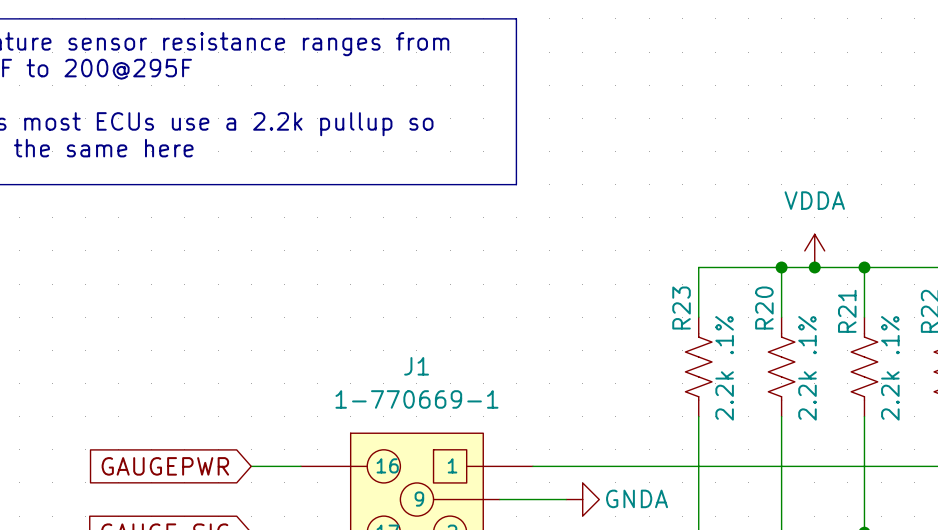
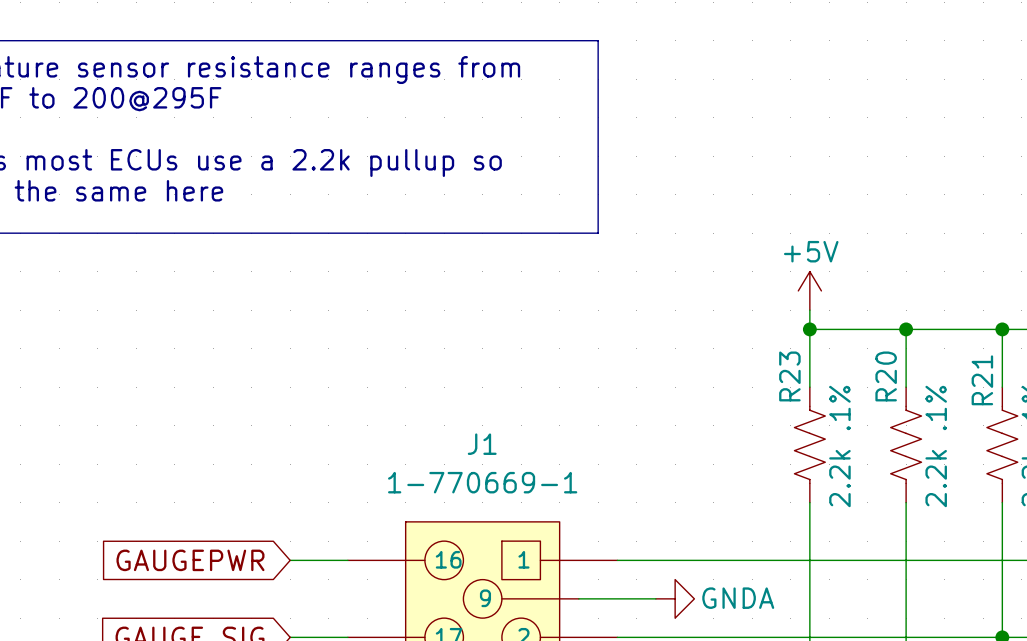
power symbol: none -> +5V (809, 290)
wire: none -> (809, 310) (809, 329)
power symbol: VDDA (814, 250) -> none
junction: none -> (809, 329)
junction: (814, 267) -> none

